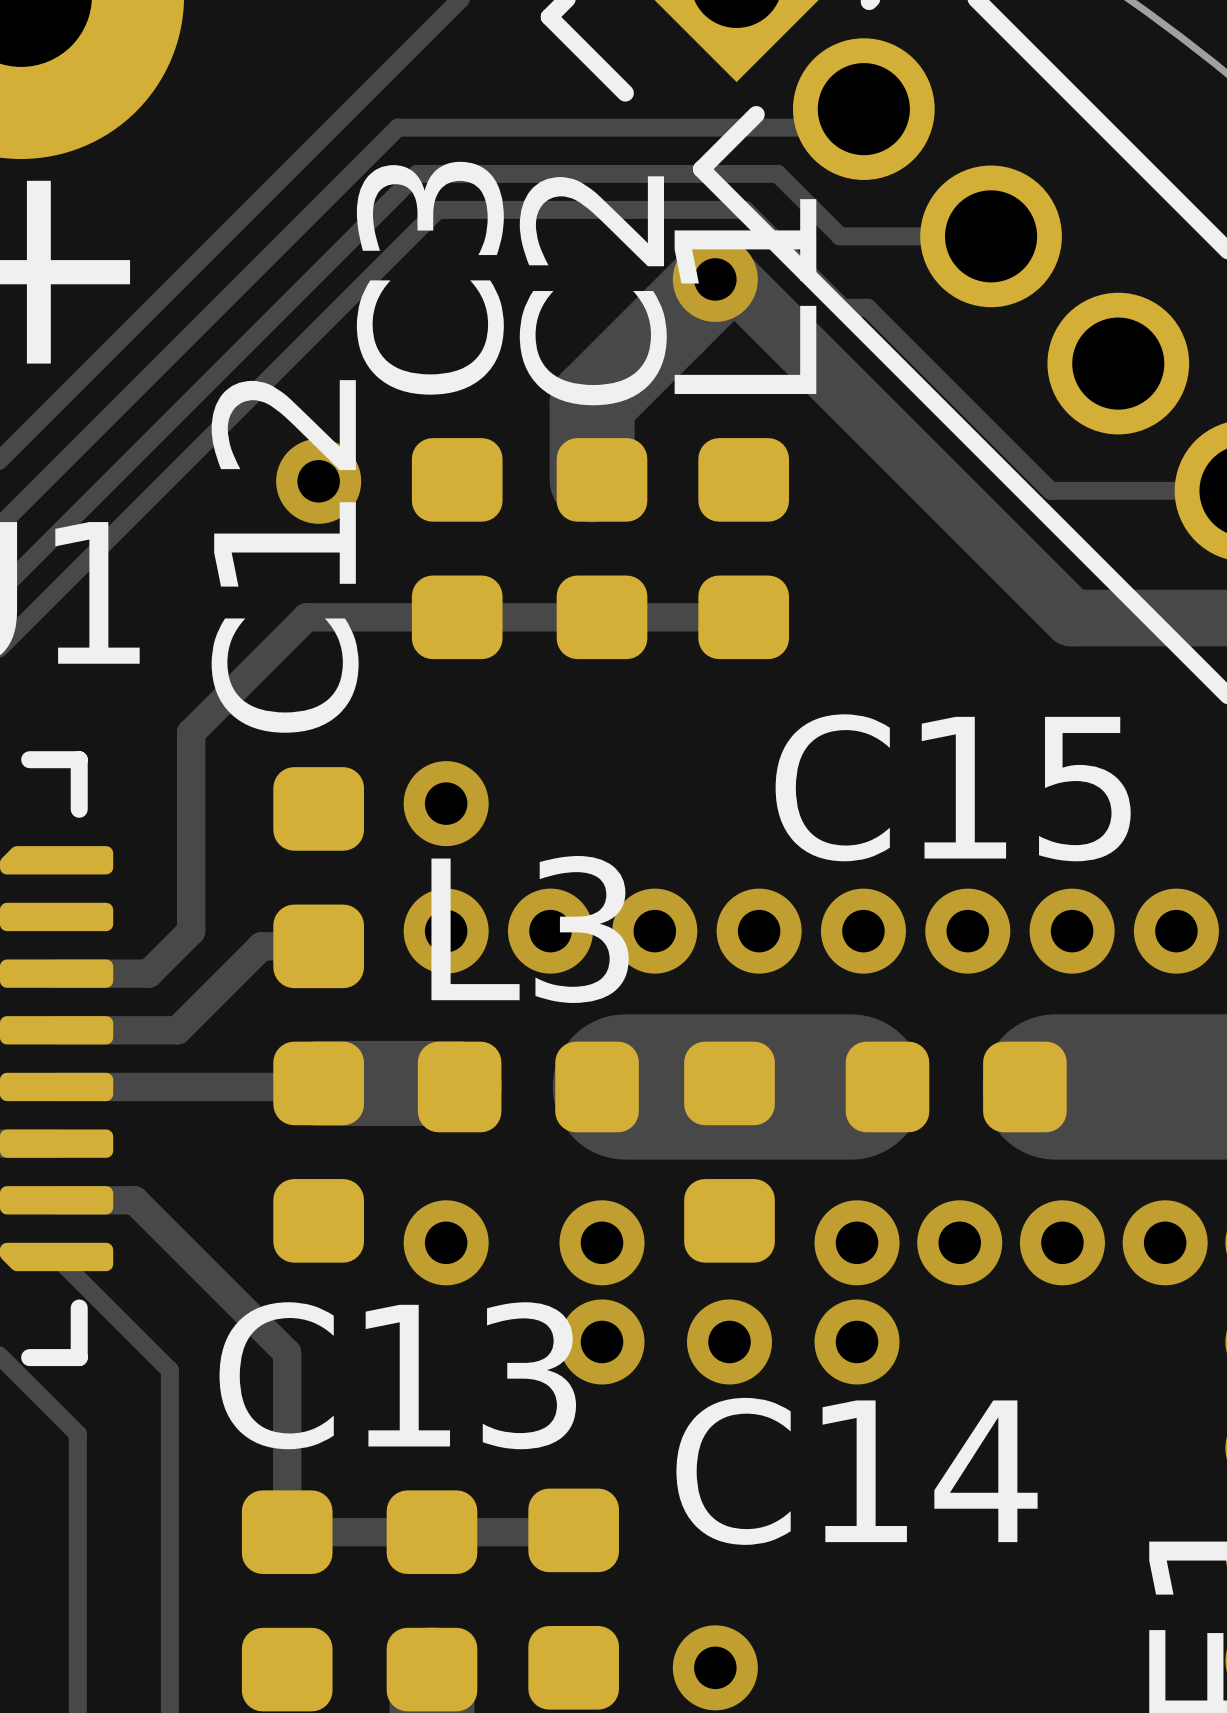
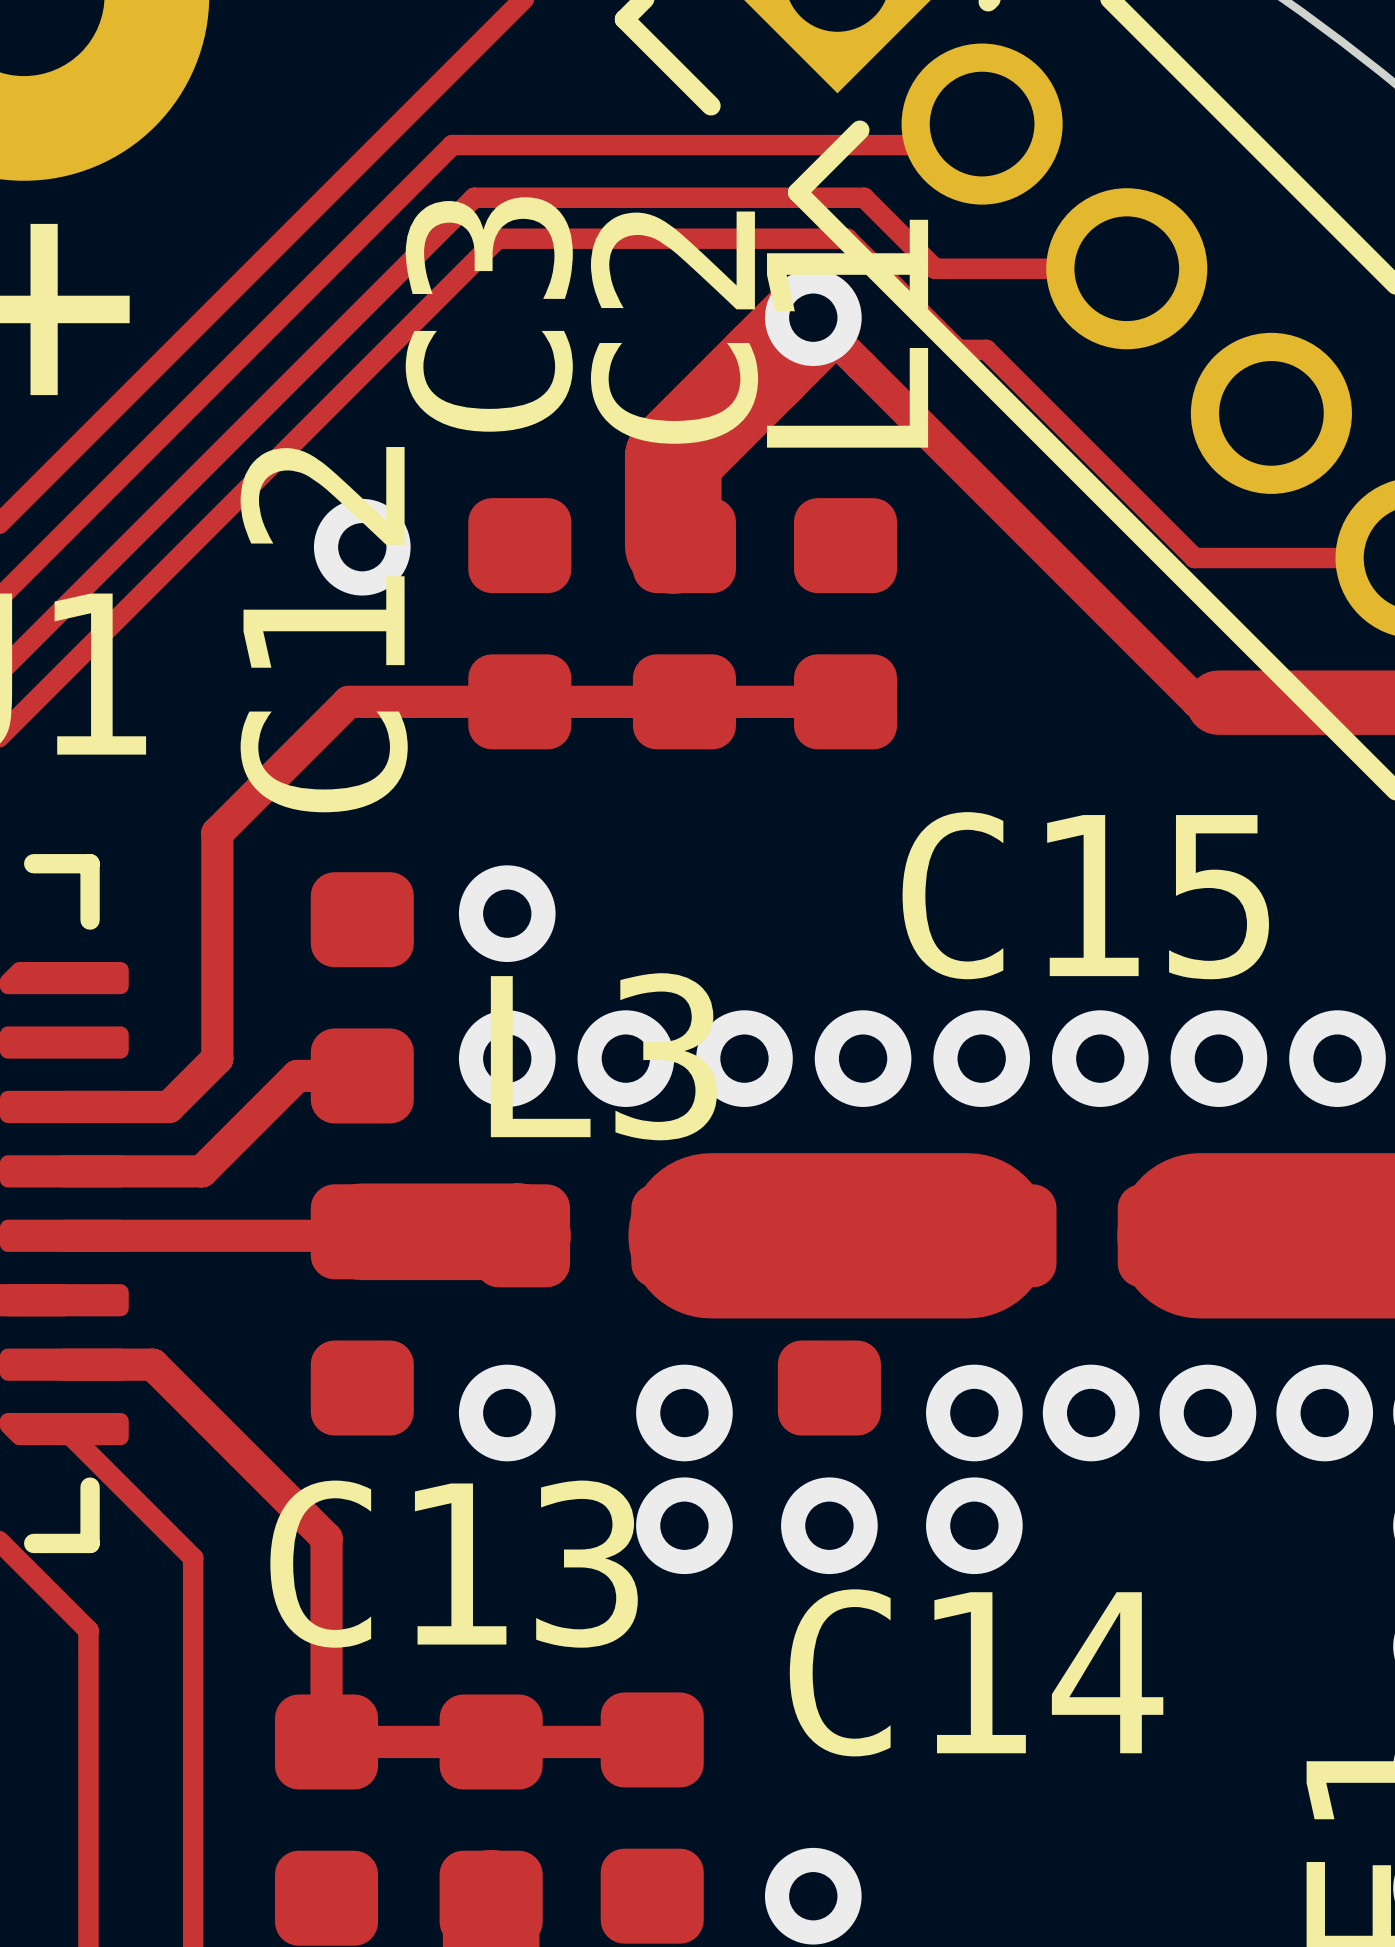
track: (760, 173) (777, 173) (840, 236) -> (864, 197) (935, 268) (955, 268)
track: (715, 279) (733, 279) (1071, 618) -> (813, 317) (1198, 702) (1218, 702)

